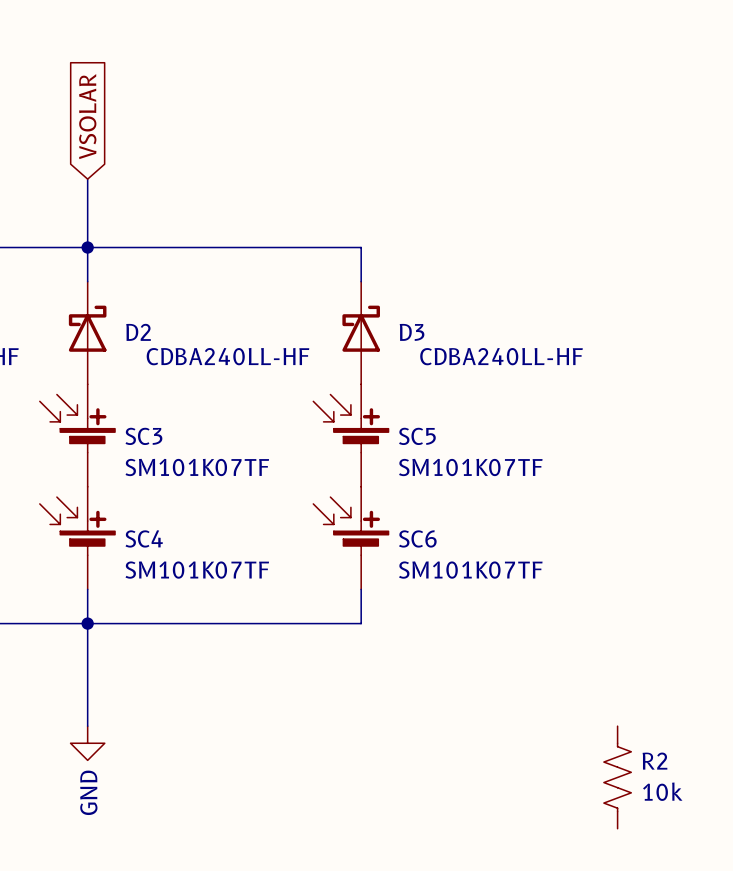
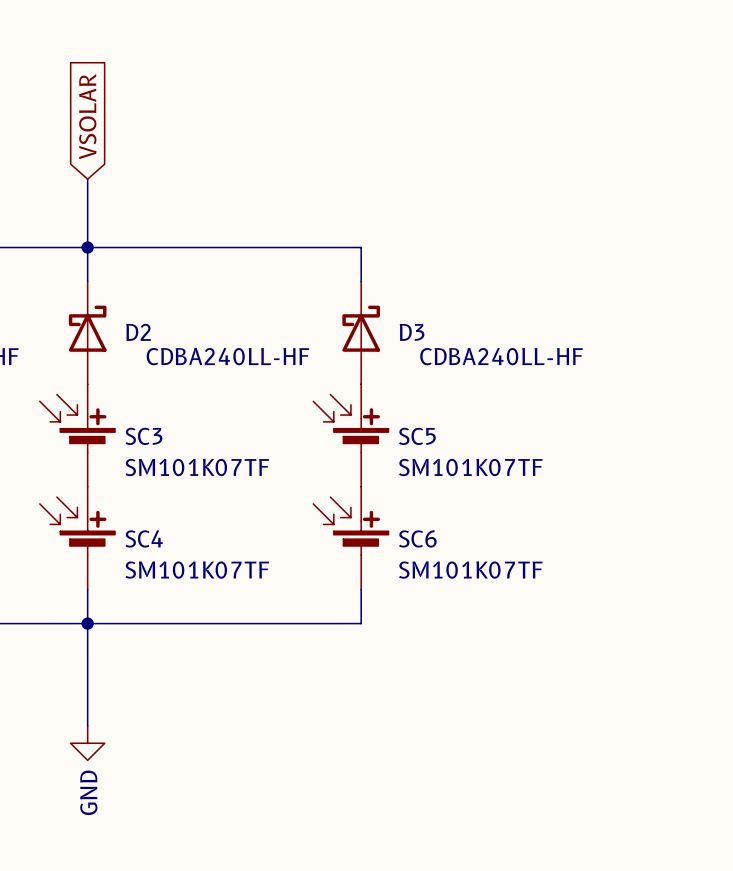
R2: 10k (617, 777) -> none

